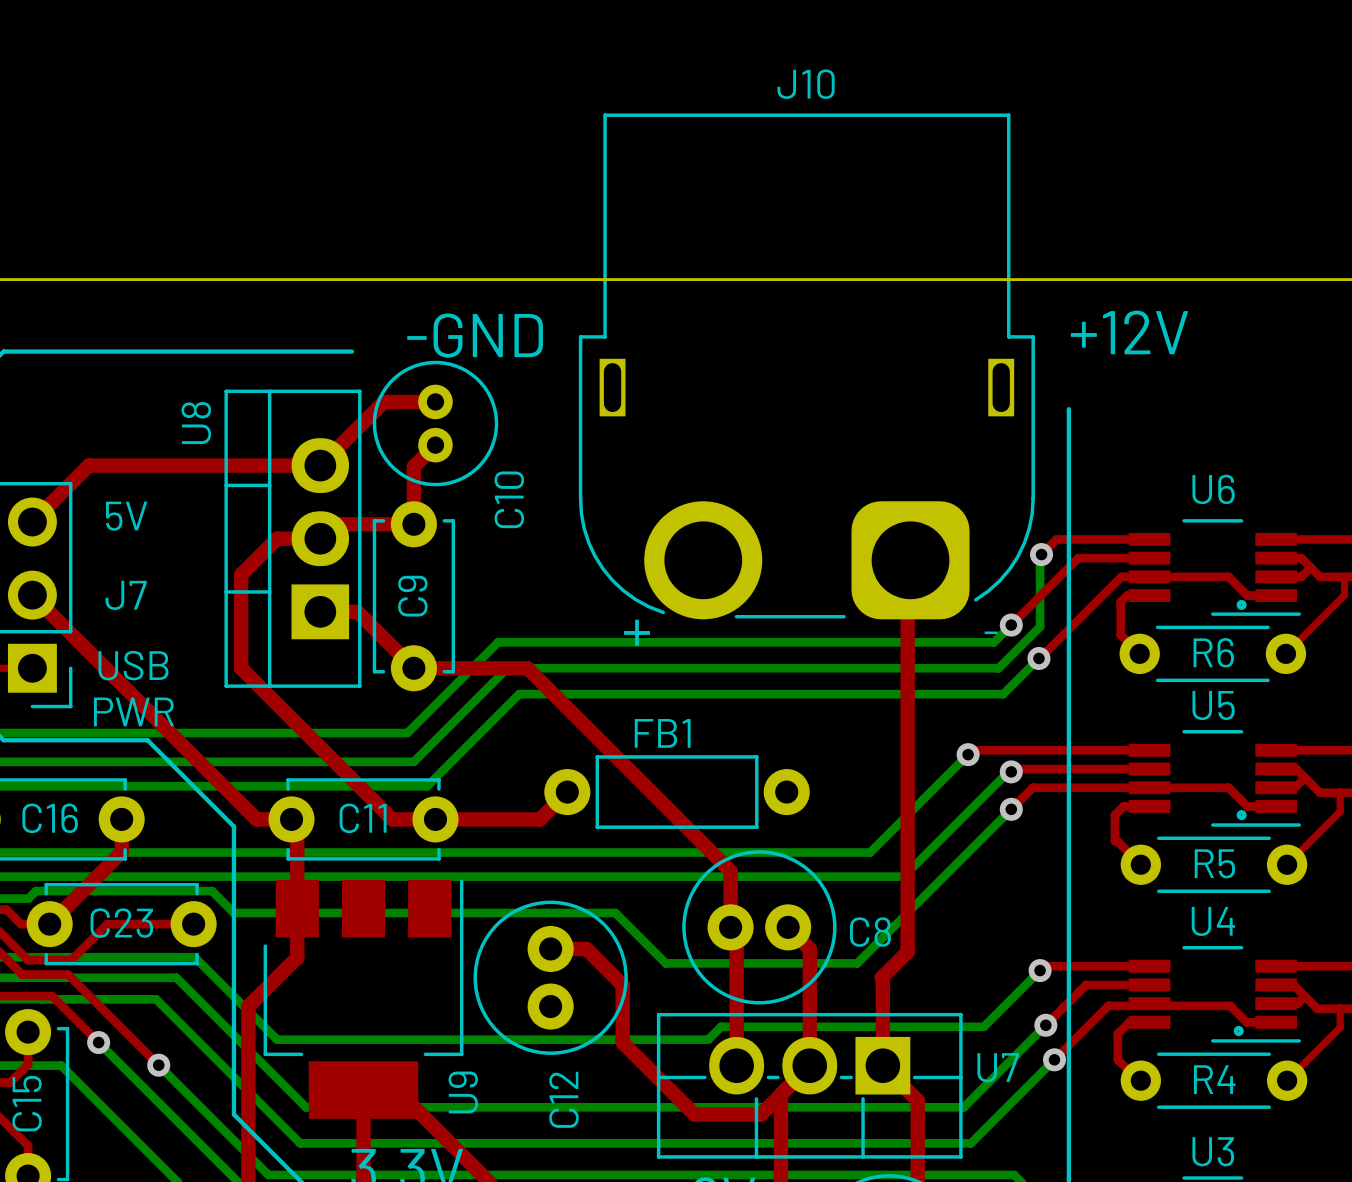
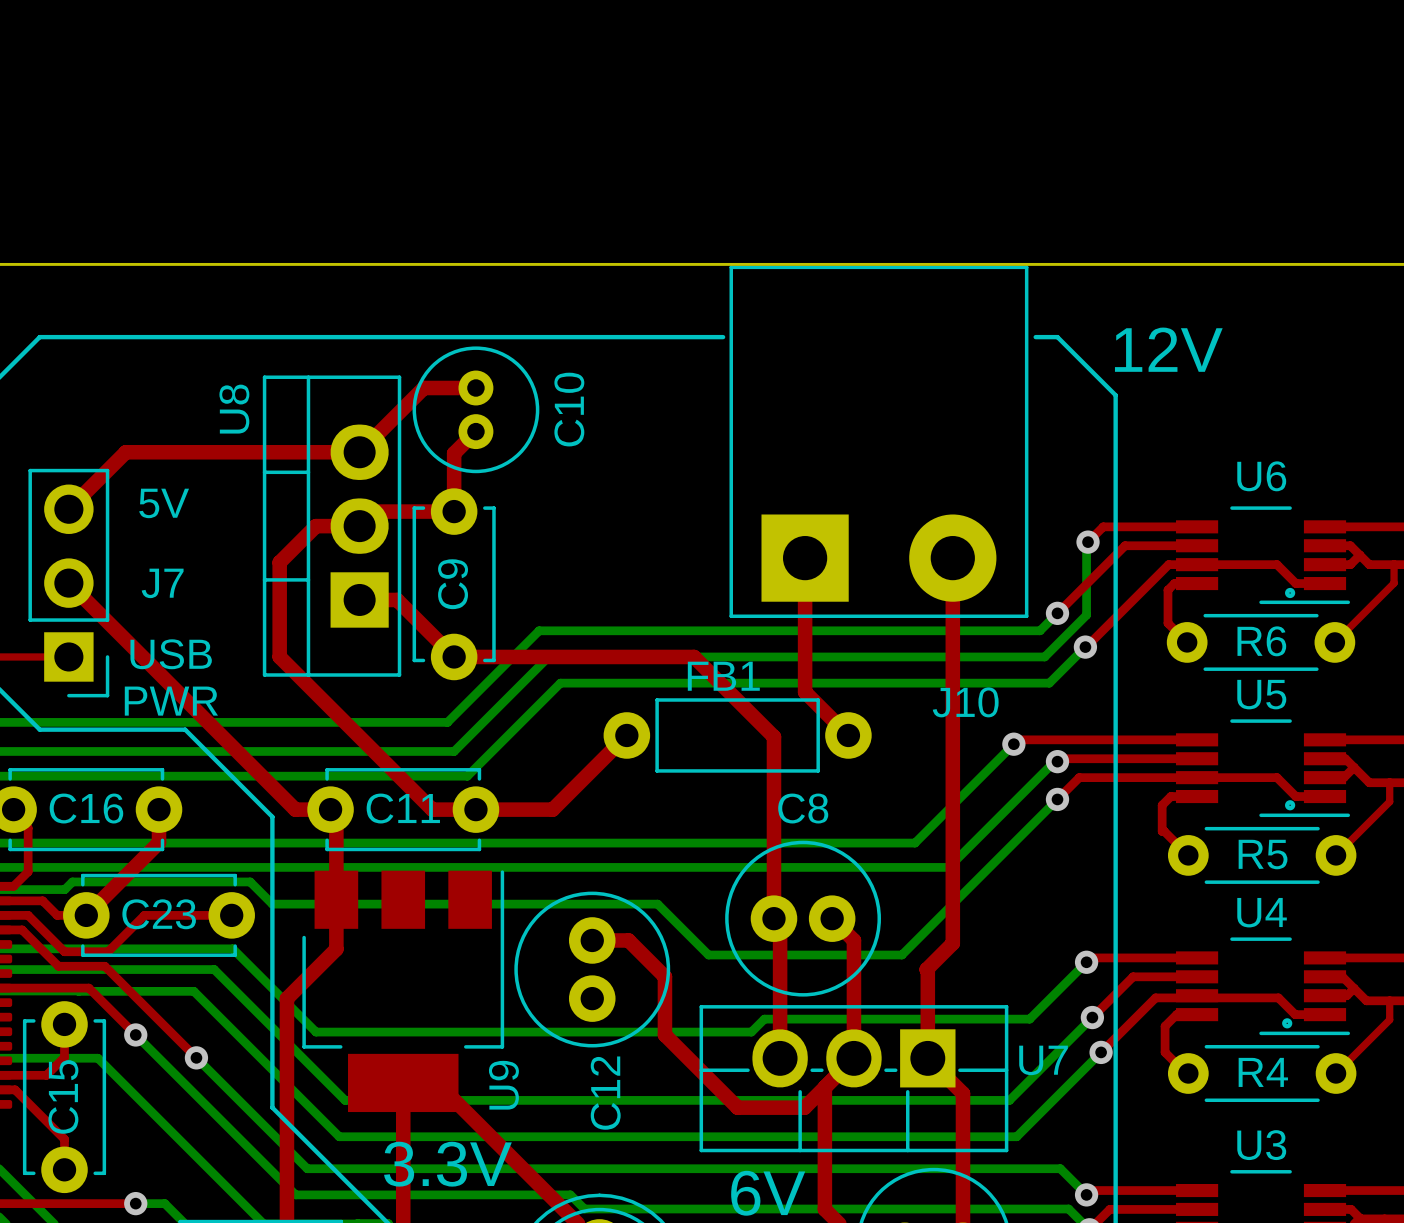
J10 name position: J10 (806, 84) -> J10 (965, 702)
J10 footprint: [578, 113, 1035, 620] -> [729, 265, 1029, 619]
text: +12V (1129, 332) -> 12V (1168, 349)
text: -GND (475, 335) -> none
line: none -> (391, 337) (723, 337)
line: none -> (1035, 337) (1057, 337) (1115, 395)
C10 name position: C10 (509, 499) -> C10 (569, 409)
top track: none -> (805, 555) (805, 692) (848, 735)
top track: (527, 668) (730, 871) -> (568, 656) (694, 656) (773, 736) (773, 861)
top track: (567, 792) (540, 819) (511, 819) -> (626, 735) (552, 809)
FB1 position: (677, 792) -> (737, 735)
C8 name position: C8 (870, 932) -> C8 (803, 808)

